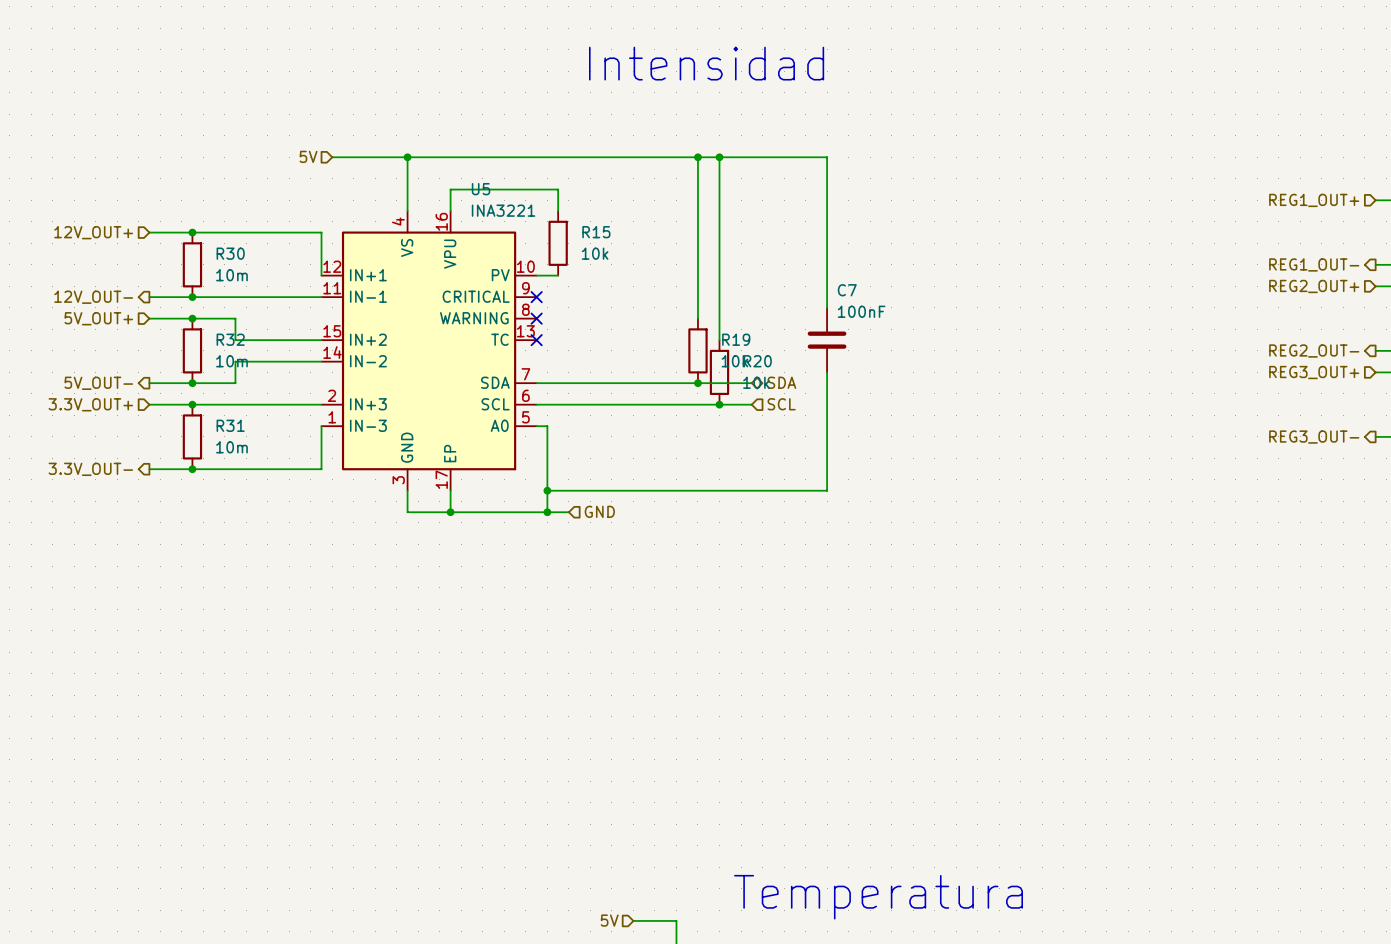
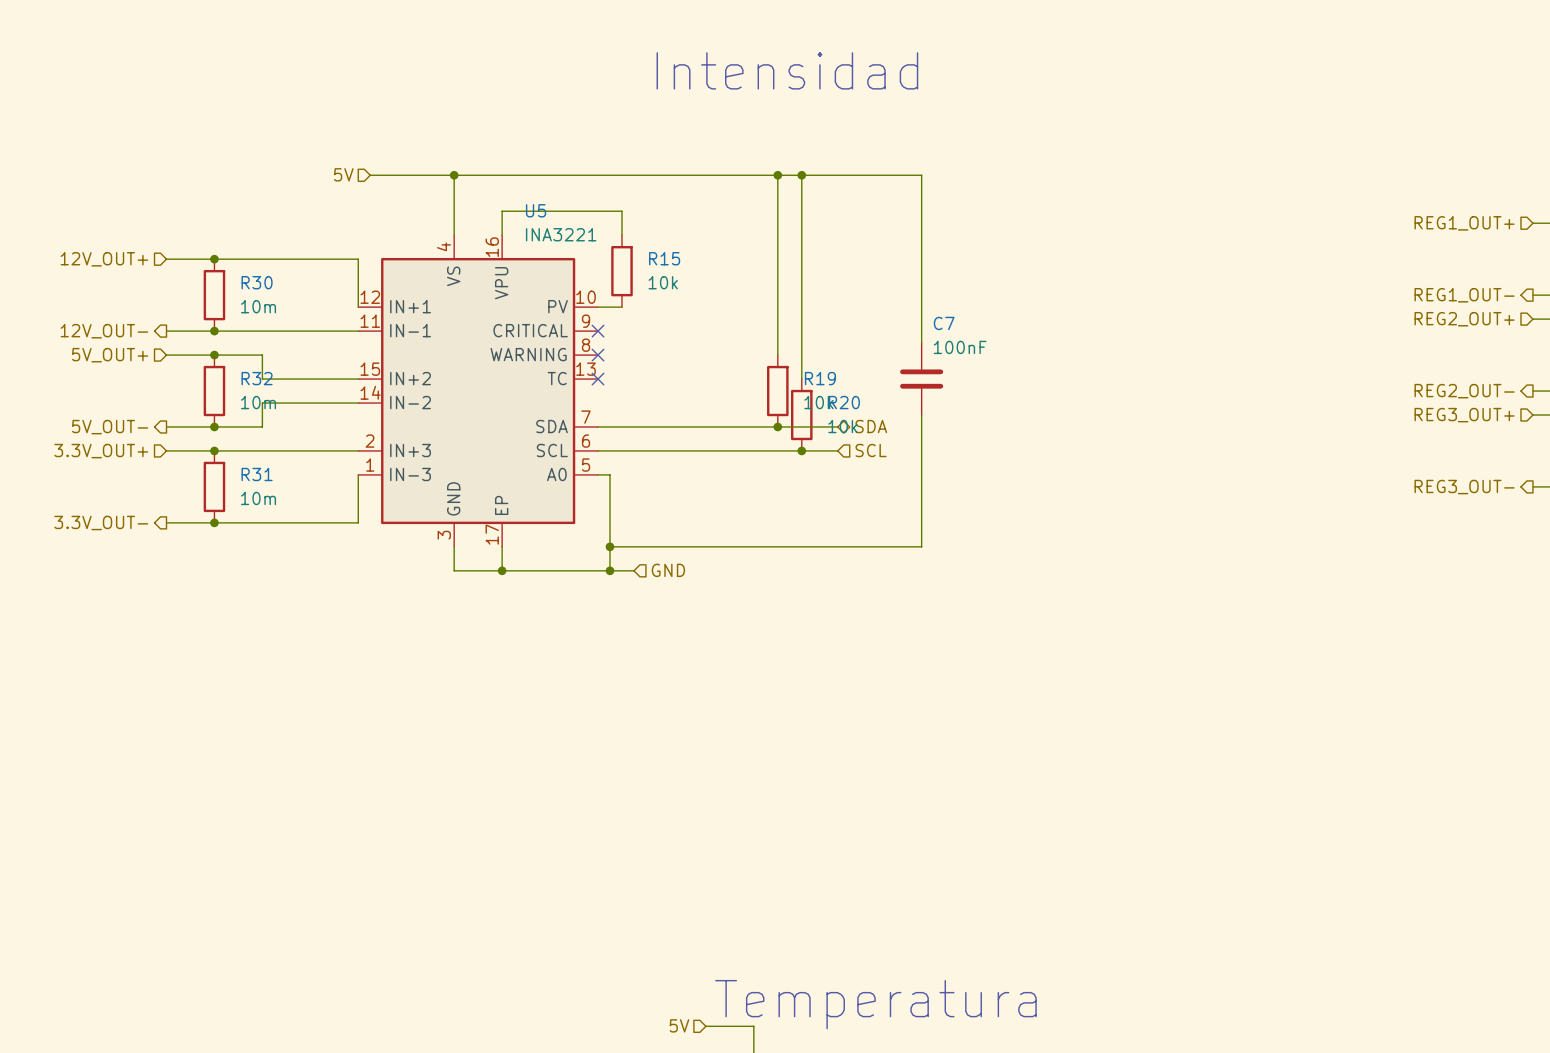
text position: Temperatura (878, 897) -> Temperatura (875, 1004)

